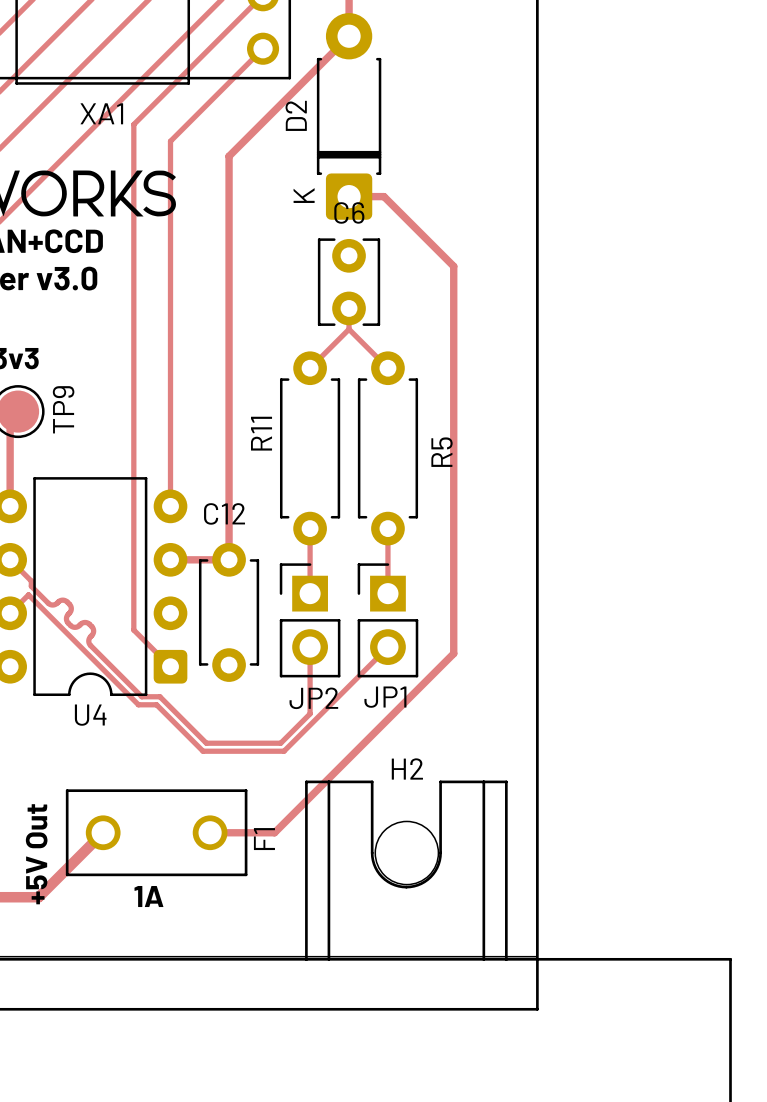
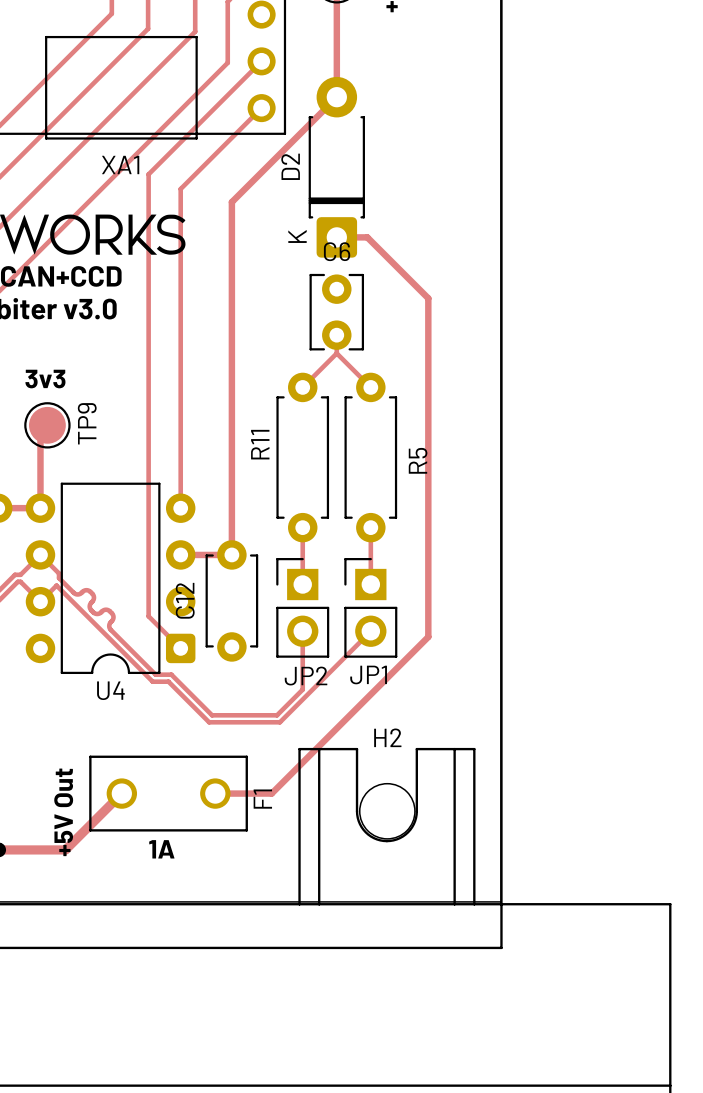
C12 name rotation: 0° (224, 513) -> 90° counterclockwise (185, 600)
C12 name position: C12 (224, 513) -> C12 (185, 600)

